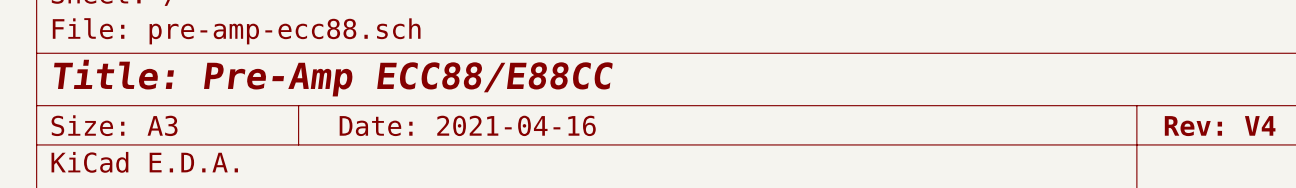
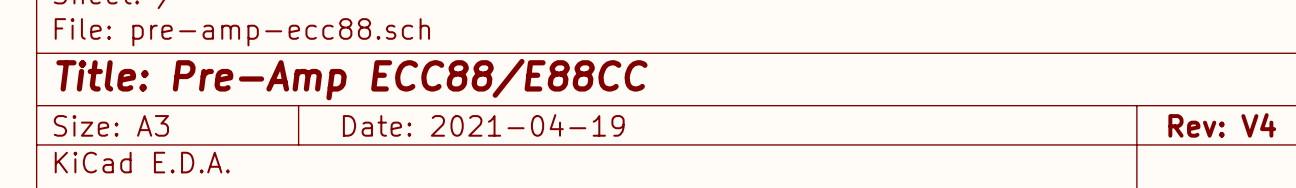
title block: Date: 2021-04-16 (467, 125) -> Date: 2021-04-19 (483, 125)

